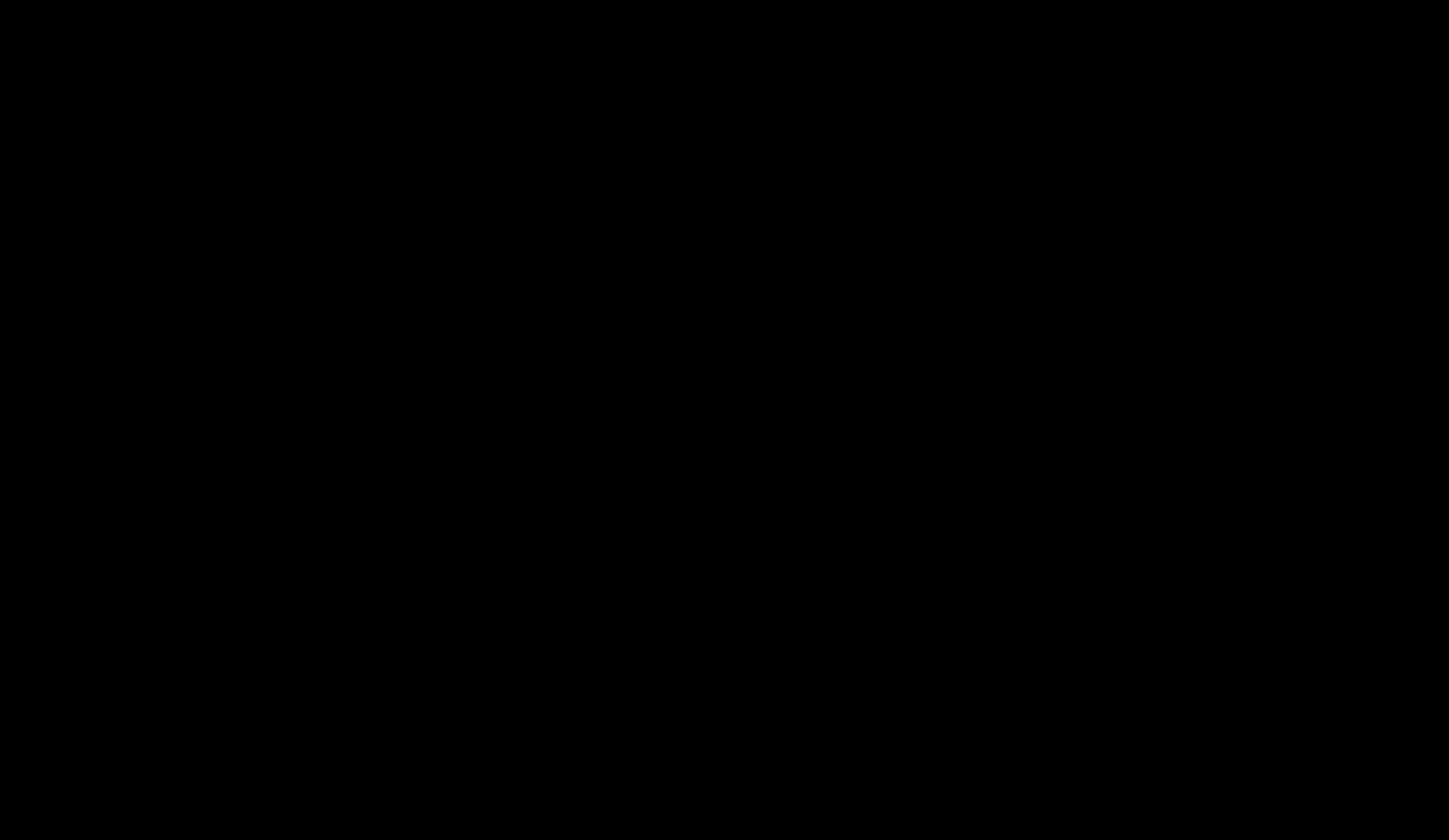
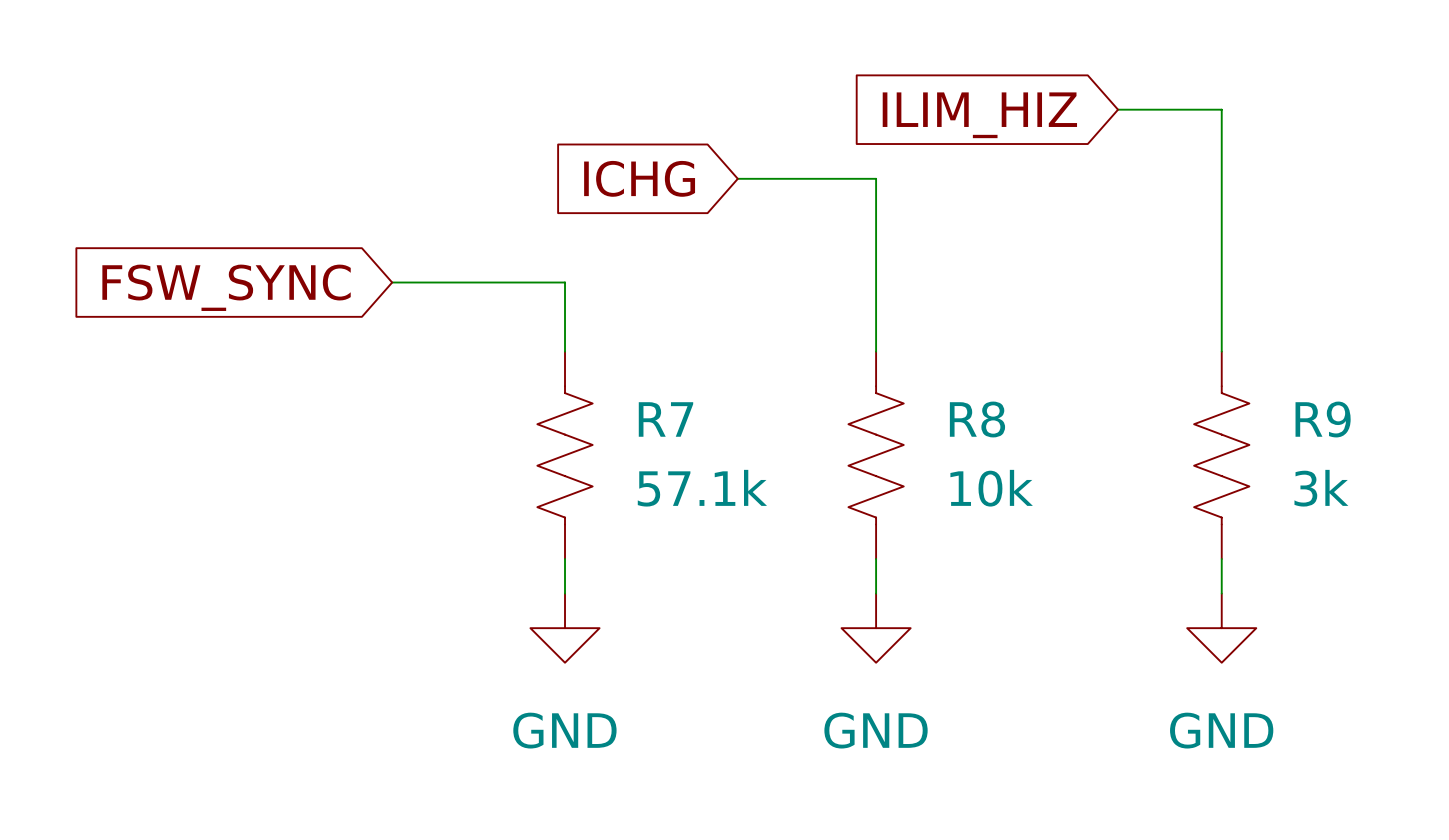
wire: none -> (1118, 109) (1221, 109) (1221, 351)
global label: none -> ILIM_HIZ (979, 115)
global label: none -> ICHG (639, 178)
wire: none -> (737, 178) (876, 178) (876, 351)
wire: none -> (392, 282) (565, 282) (565, 351)
global label: none -> FSW_SYNC (226, 287)
R7: none -> 57.1k (565, 455)
R8: none -> 10k (876, 455)
R9: none -> 3k (1221, 455)
wire: none -> (565, 559) (565, 593)
wire: none -> (876, 559) (876, 593)
wire: none -> (1221, 559) (1221, 593)
power symbol: none -> GND (565, 628)
power symbol: none -> GND (876, 628)
power symbol: none -> GND (1221, 628)

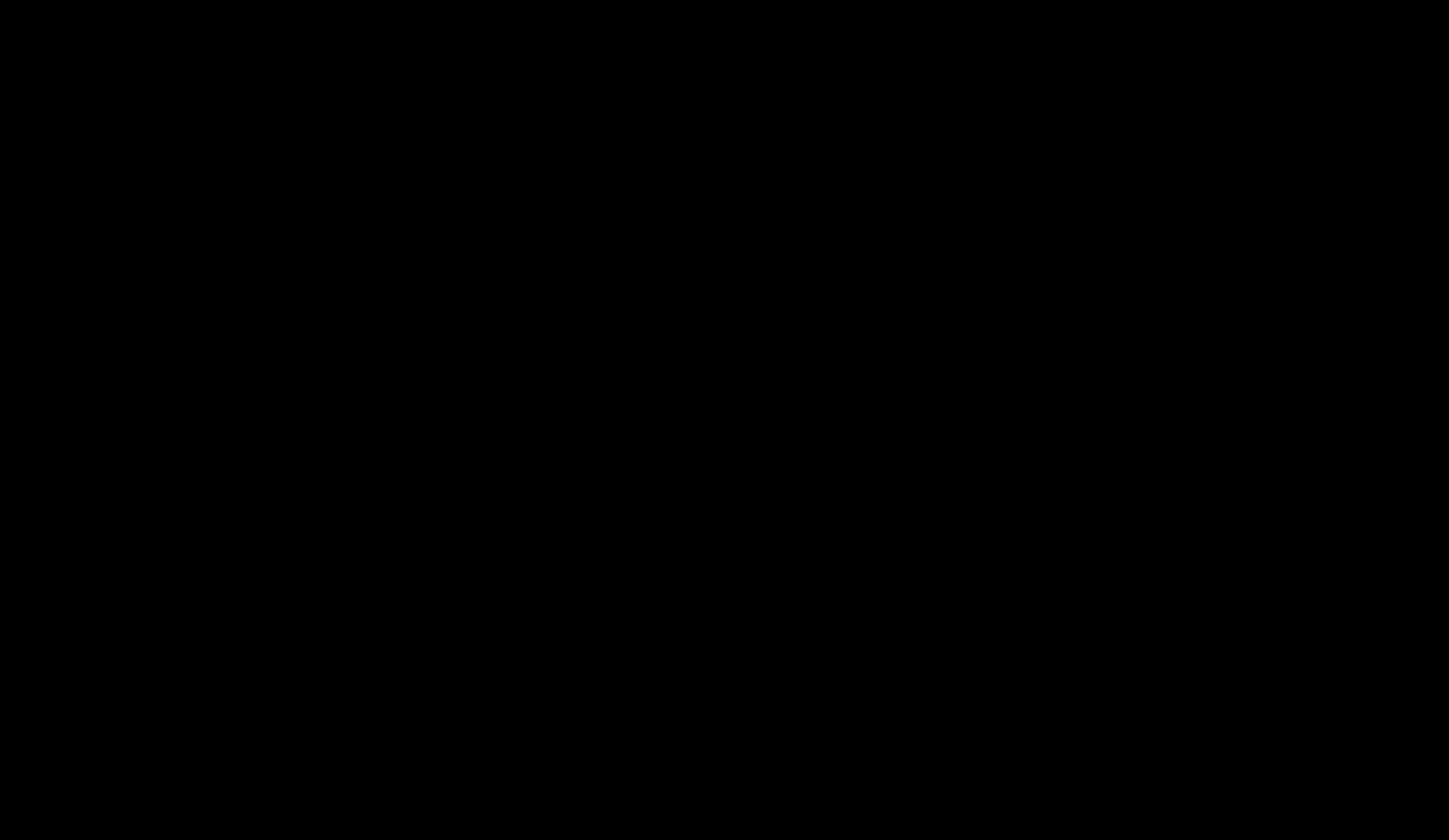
wire: (1118, 109) (1221, 109) (1221, 351) -> none
global label: ILIM_HIZ (979, 115) -> none
global label: ICHG (639, 178) -> none
wire: (737, 178) (876, 178) (876, 351) -> none
wire: (392, 282) (565, 282) (565, 351) -> none
global label: FSW_SYNC (226, 287) -> none
R7: 57.1k (565, 455) -> none
R8: 10k (876, 455) -> none
R9: 3k (1221, 455) -> none
wire: (565, 559) (565, 593) -> none
wire: (876, 559) (876, 593) -> none
wire: (1221, 559) (1221, 593) -> none
power symbol: GND (565, 628) -> none
power symbol: GND (876, 628) -> none
power symbol: GND (1221, 628) -> none

